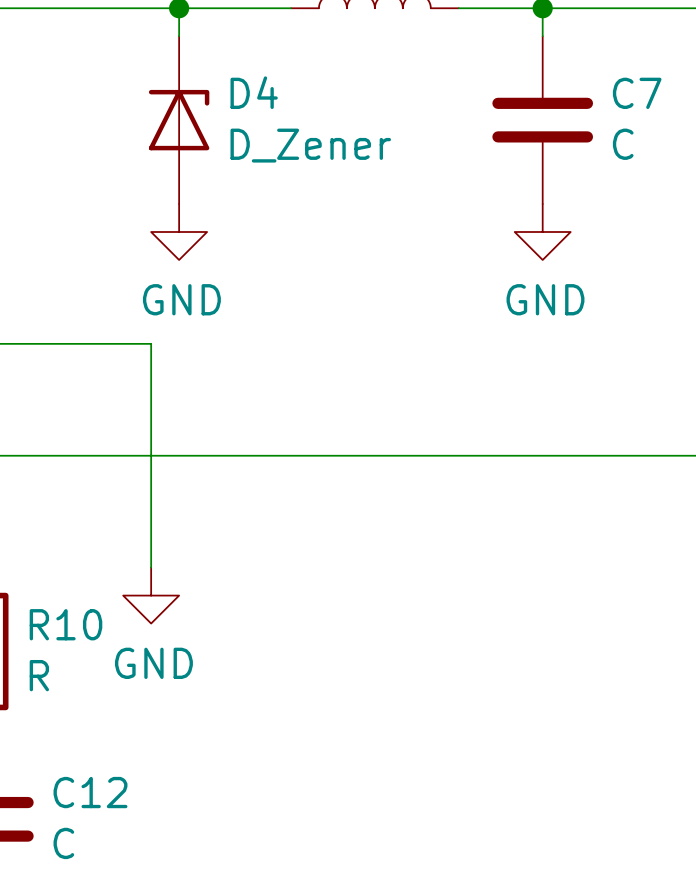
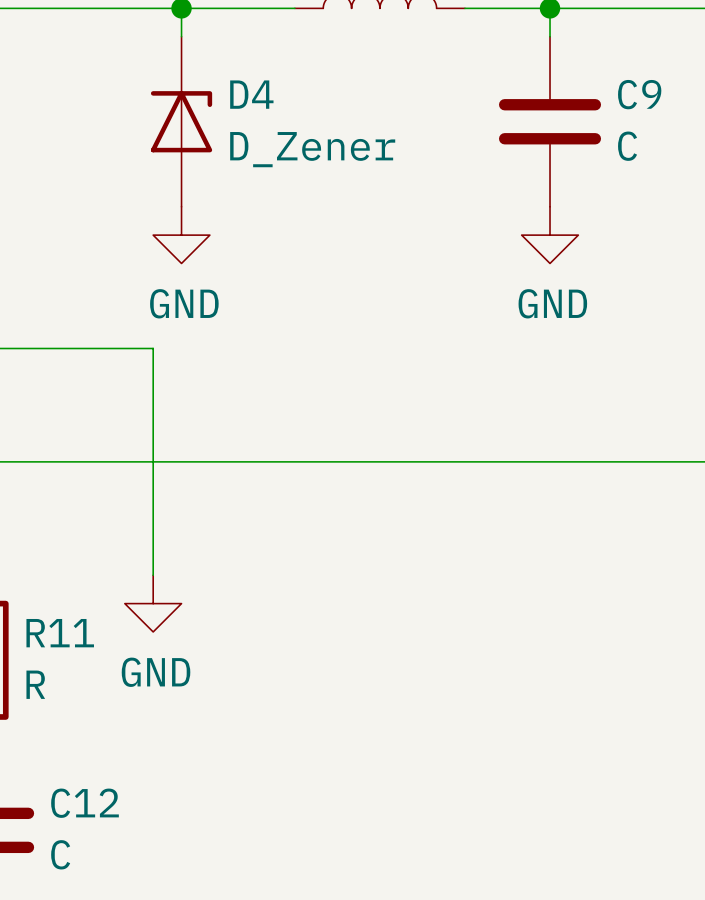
C7 name: C7 (637, 93) -> C9 (639, 94)
R10 name: R10 (65, 624) -> R11 (60, 633)

